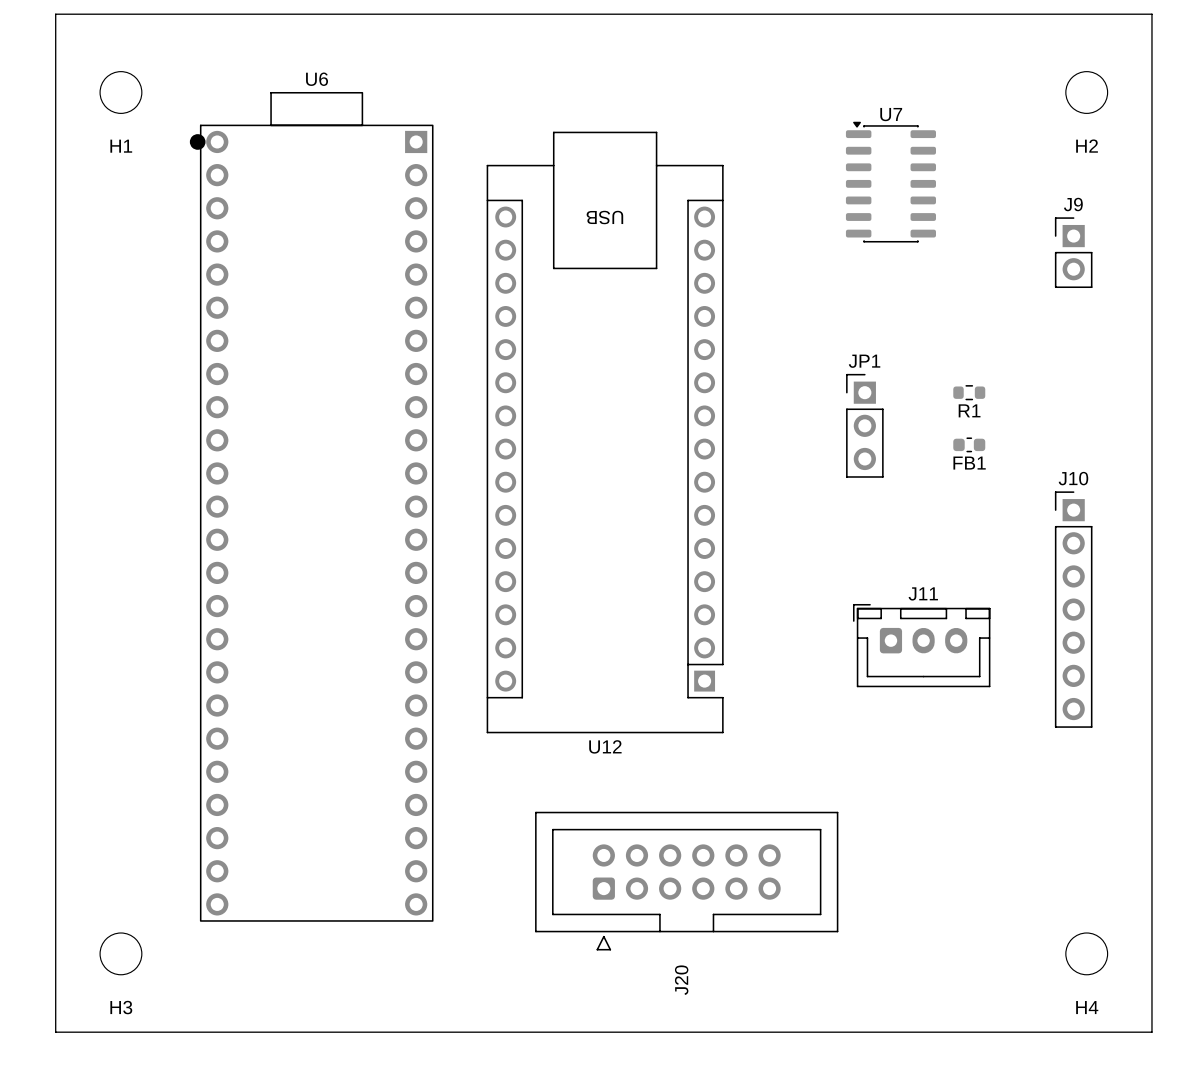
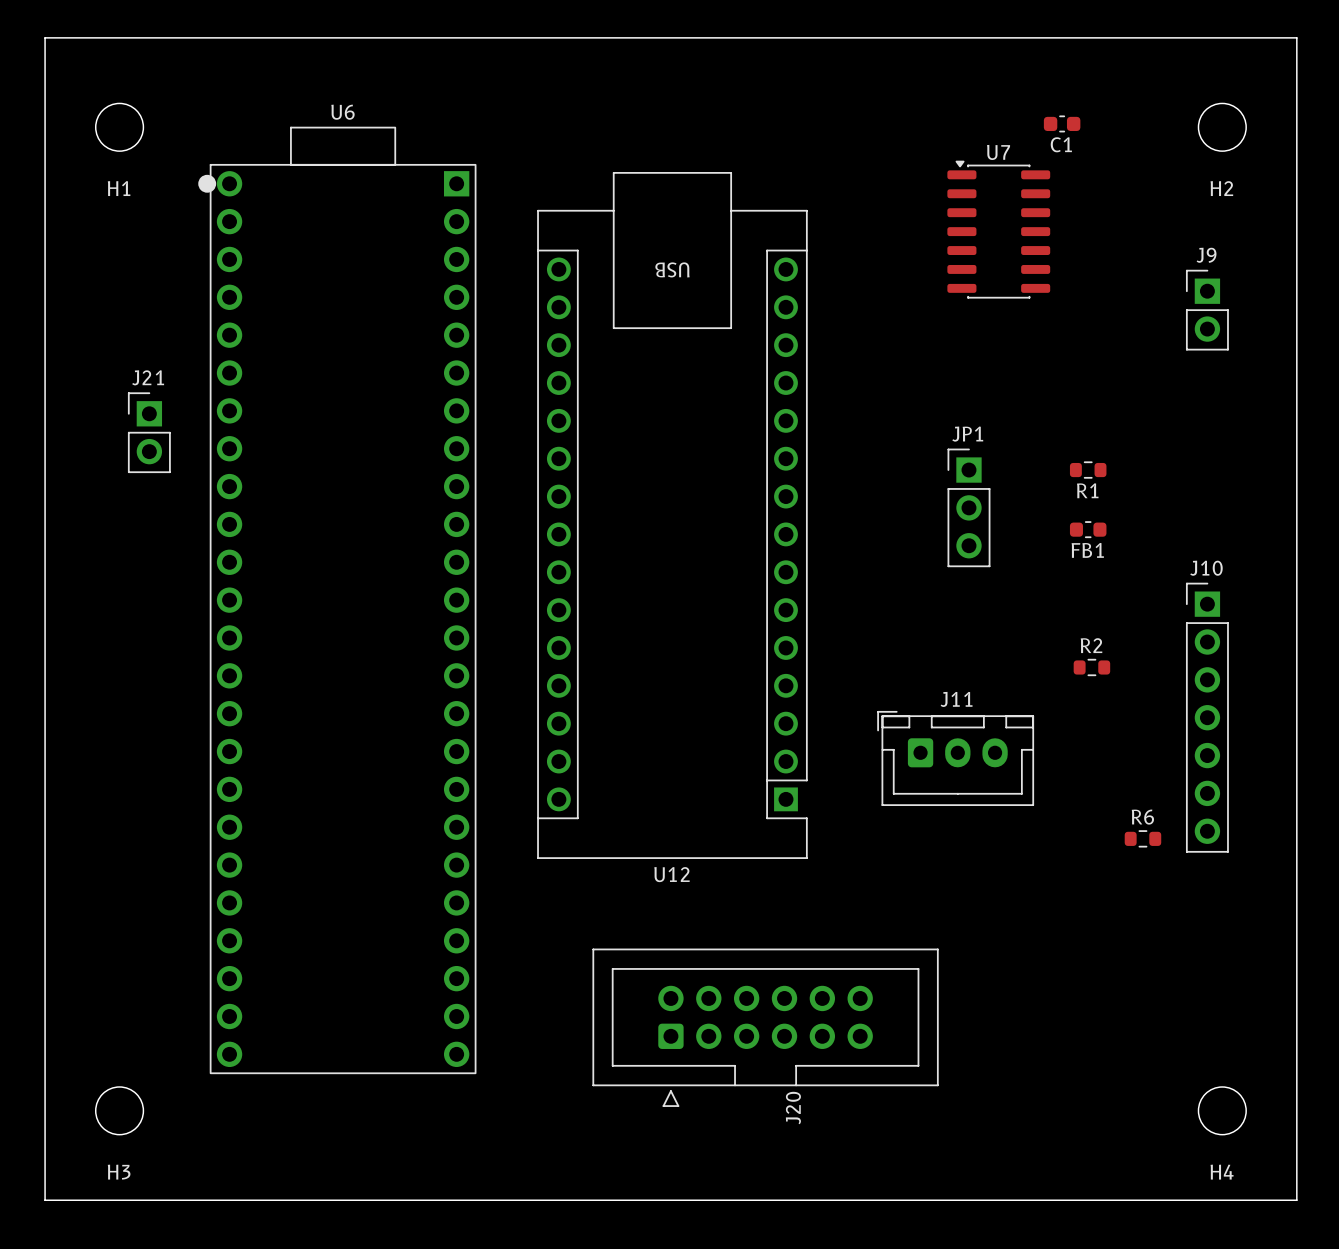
C1: none -> (1062, 123)
J21: none -> (149, 432)
R2: none -> (1091, 667)
J11 position: (921, 645) -> (955, 758)
R6: none -> (1142, 838)
J20 name position: J20 (681, 980) -> J20 (793, 1108)

